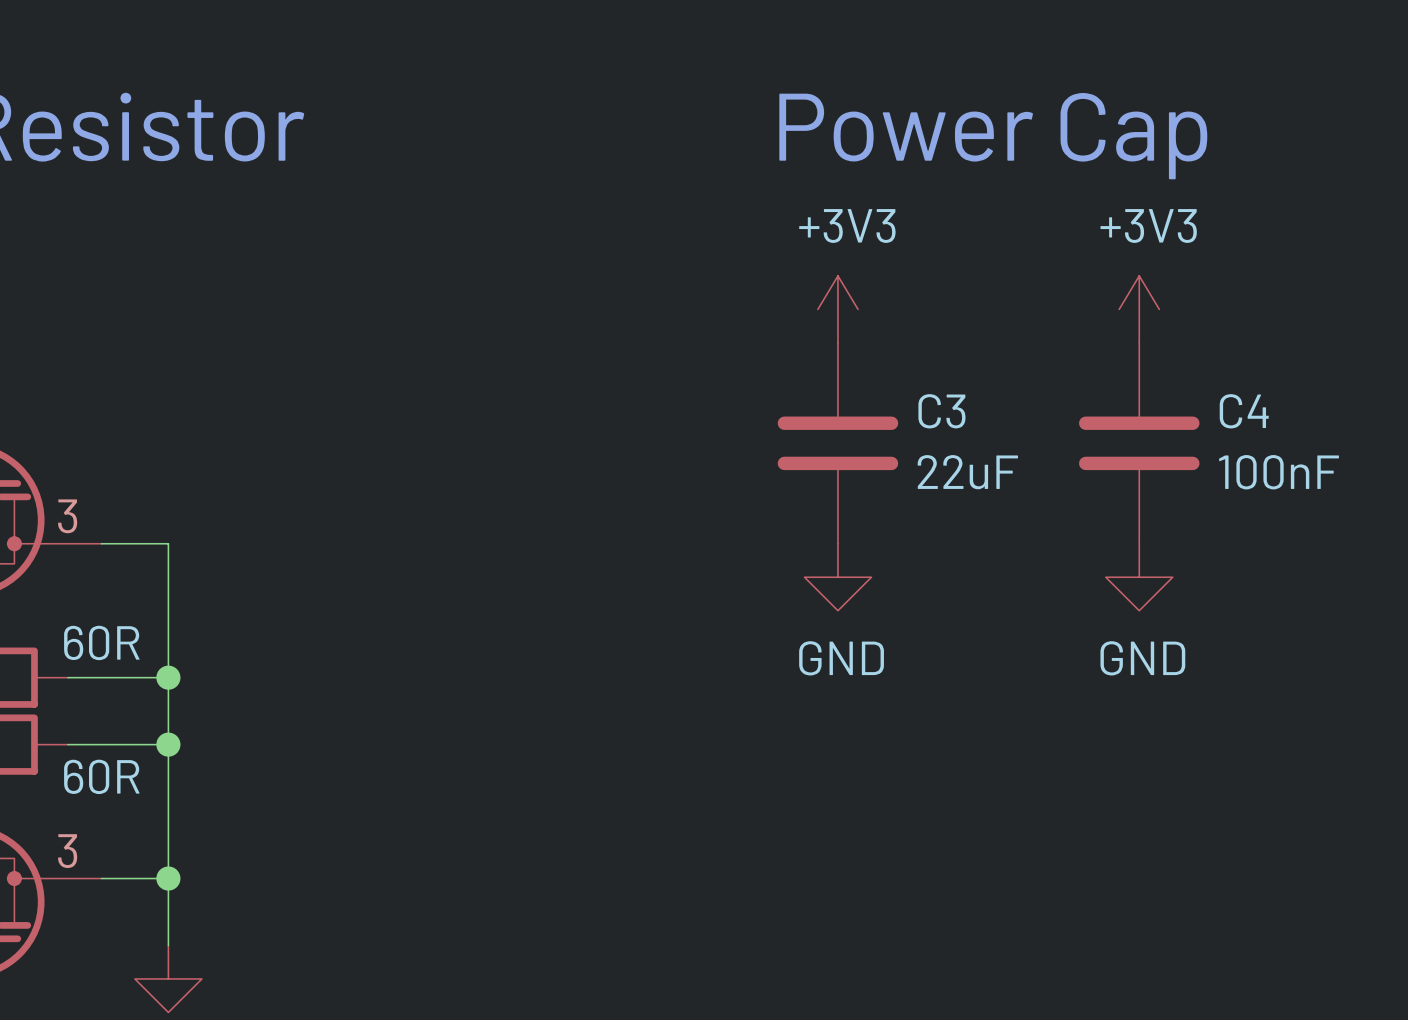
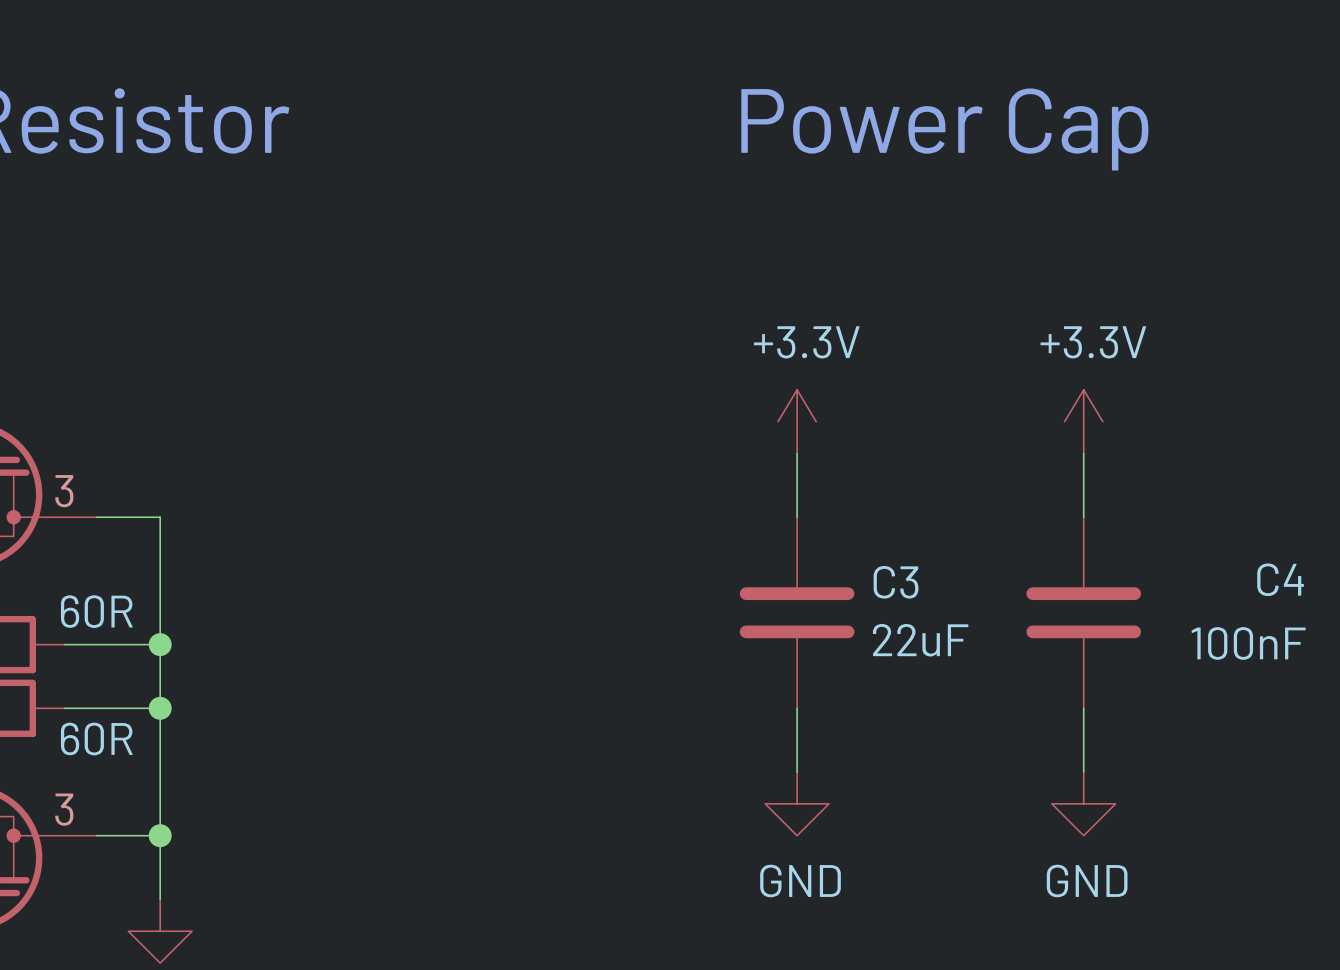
power symbol: +3V3 (837, 309) -> none
power symbol: +3V3 (1139, 309) -> none
C4 name position: C4 (1244, 411) -> C4 (1280, 579)
C3 position: (837, 443) -> (797, 612)
power symbol: none -> +3.3V (797, 421)
C4 position: (1139, 443) -> (1083, 612)
power symbol: none -> +3.3V (1083, 421)
C4 value position: 100nF (1278, 472) -> 100nF (1248, 643)
power symbol: GND (837, 577) -> none
power symbol: GND (1139, 577) -> none
wire: none -> (797, 708) (797, 772)
wire: none -> (1083, 708) (1083, 772)
power symbol: none -> GND (797, 803)
power symbol: none -> GND (1083, 803)

